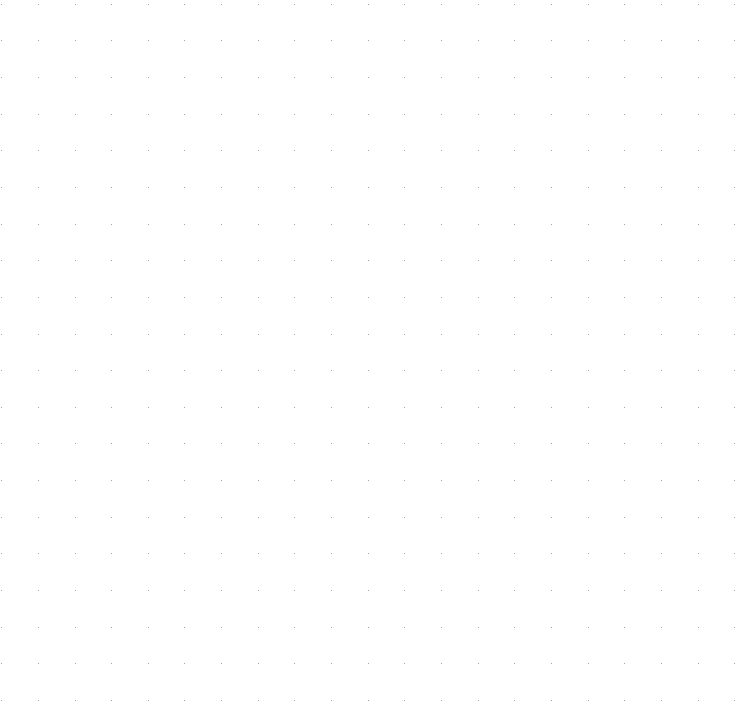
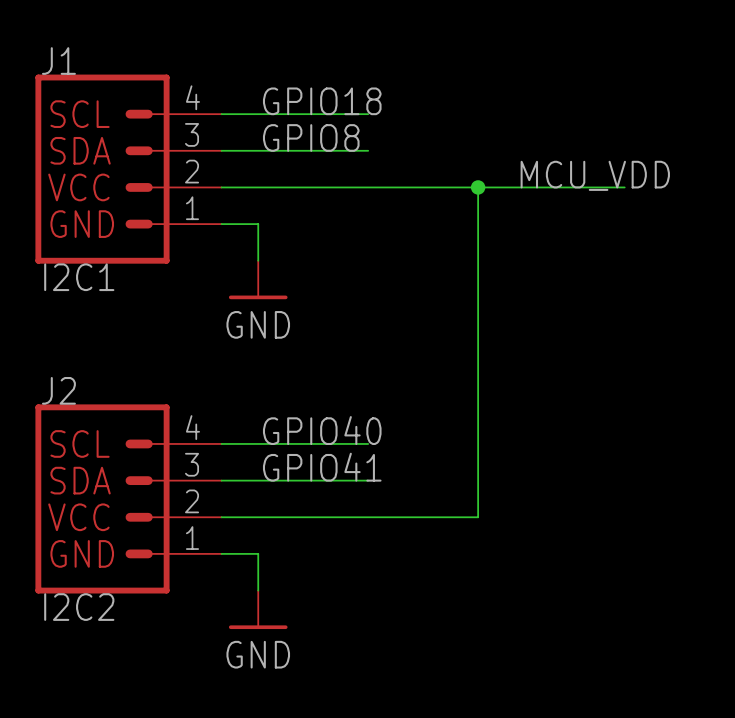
label: none -> GPIO18 (322, 101)
wire: none -> (221, 114) (368, 114)
label: none -> GPIO8 (311, 137)
wire: none -> (221, 150) (368, 150)
J1: none -> I2C1 (128, 169)
label: none -> MCU_VDD (595, 175)
wire: none -> (221, 187) (624, 187)
wire: none -> (478, 187) (478, 517) (221, 517)
junction: none -> (478, 187)
wire: none -> (221, 224) (258, 224) (258, 260)
power symbol: none -> GND (258, 279)
label: none -> GPIO40 (322, 430)
wire: none -> (221, 443) (368, 443)
label: none -> GPIO41 (322, 467)
wire: none -> (221, 480) (368, 480)
J2: none -> I2C2 (128, 498)
wire: none -> (221, 553) (258, 553) (258, 590)
power symbol: none -> GND (258, 609)

